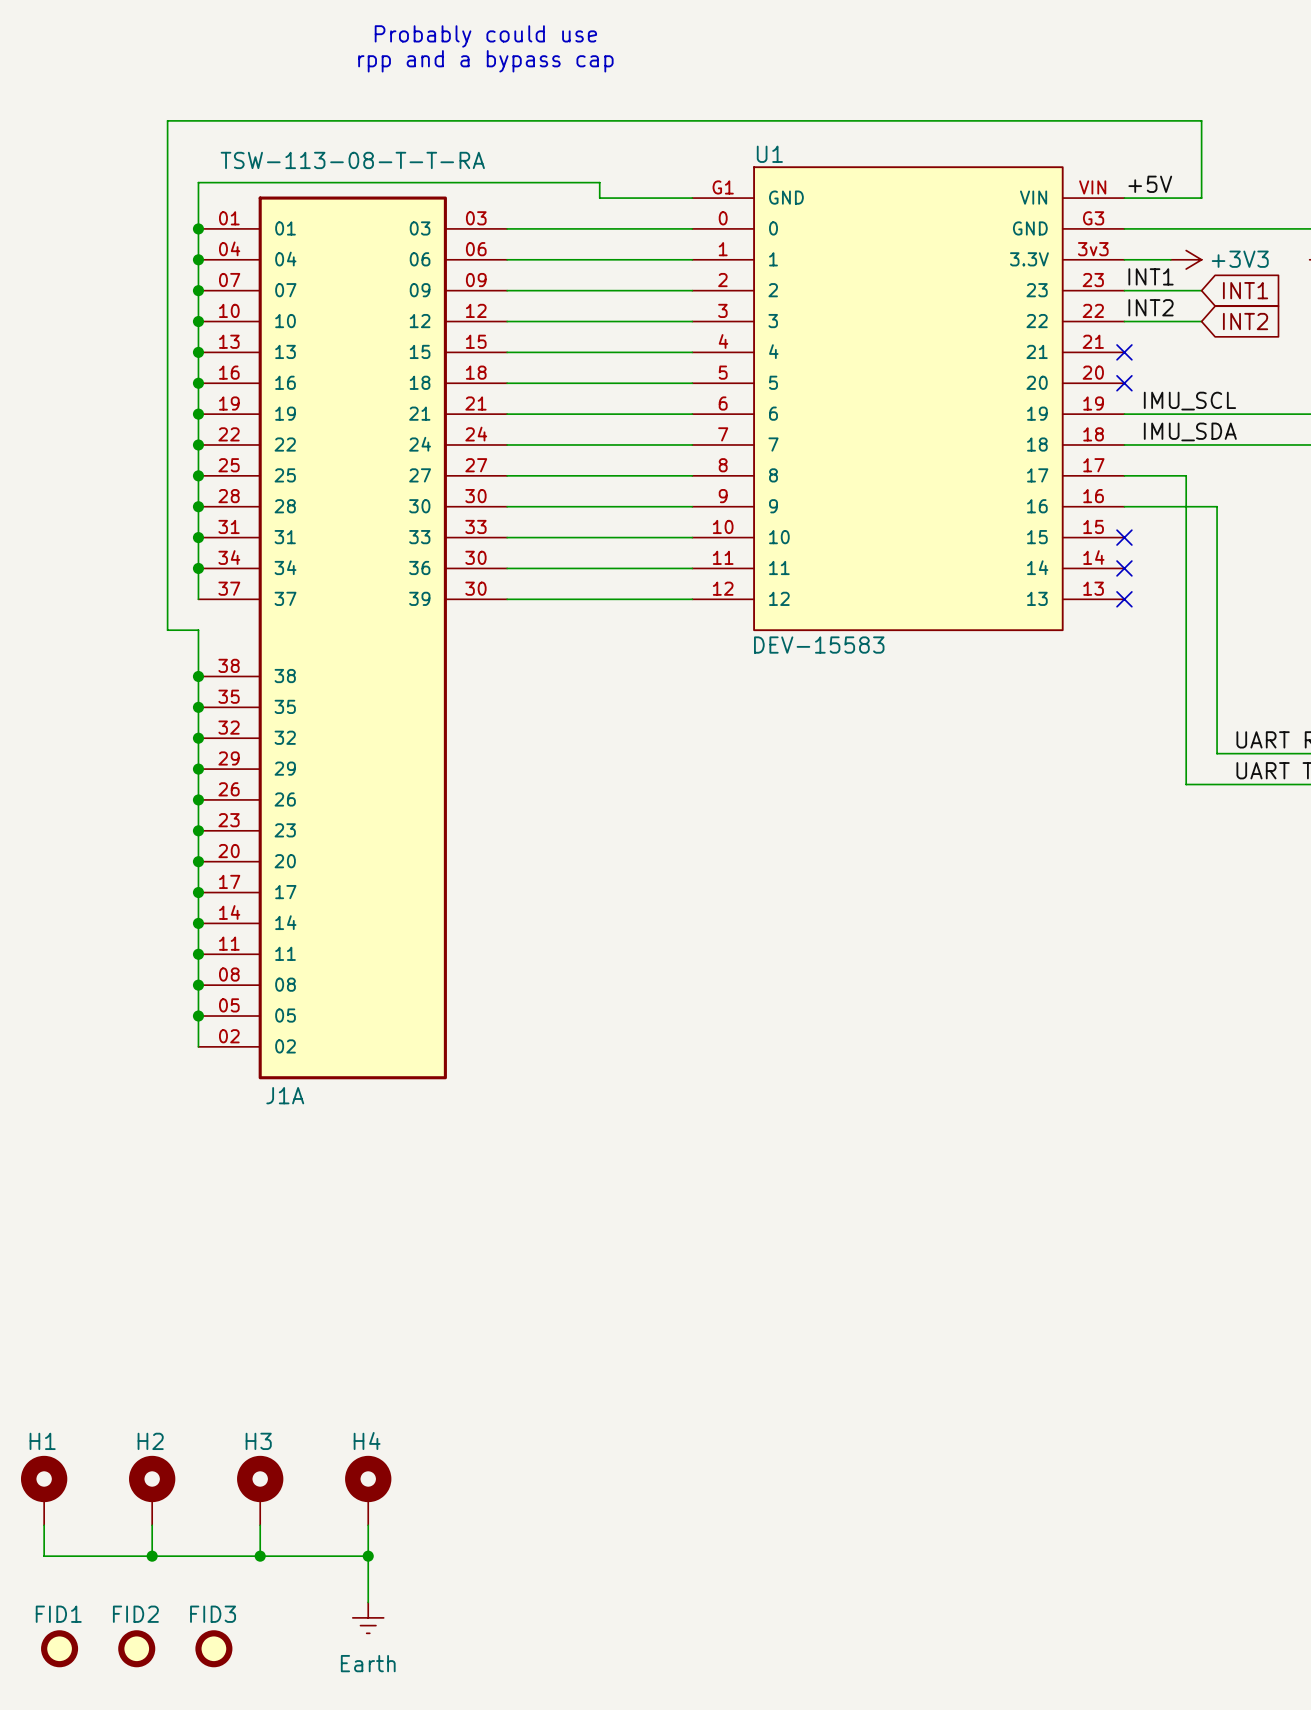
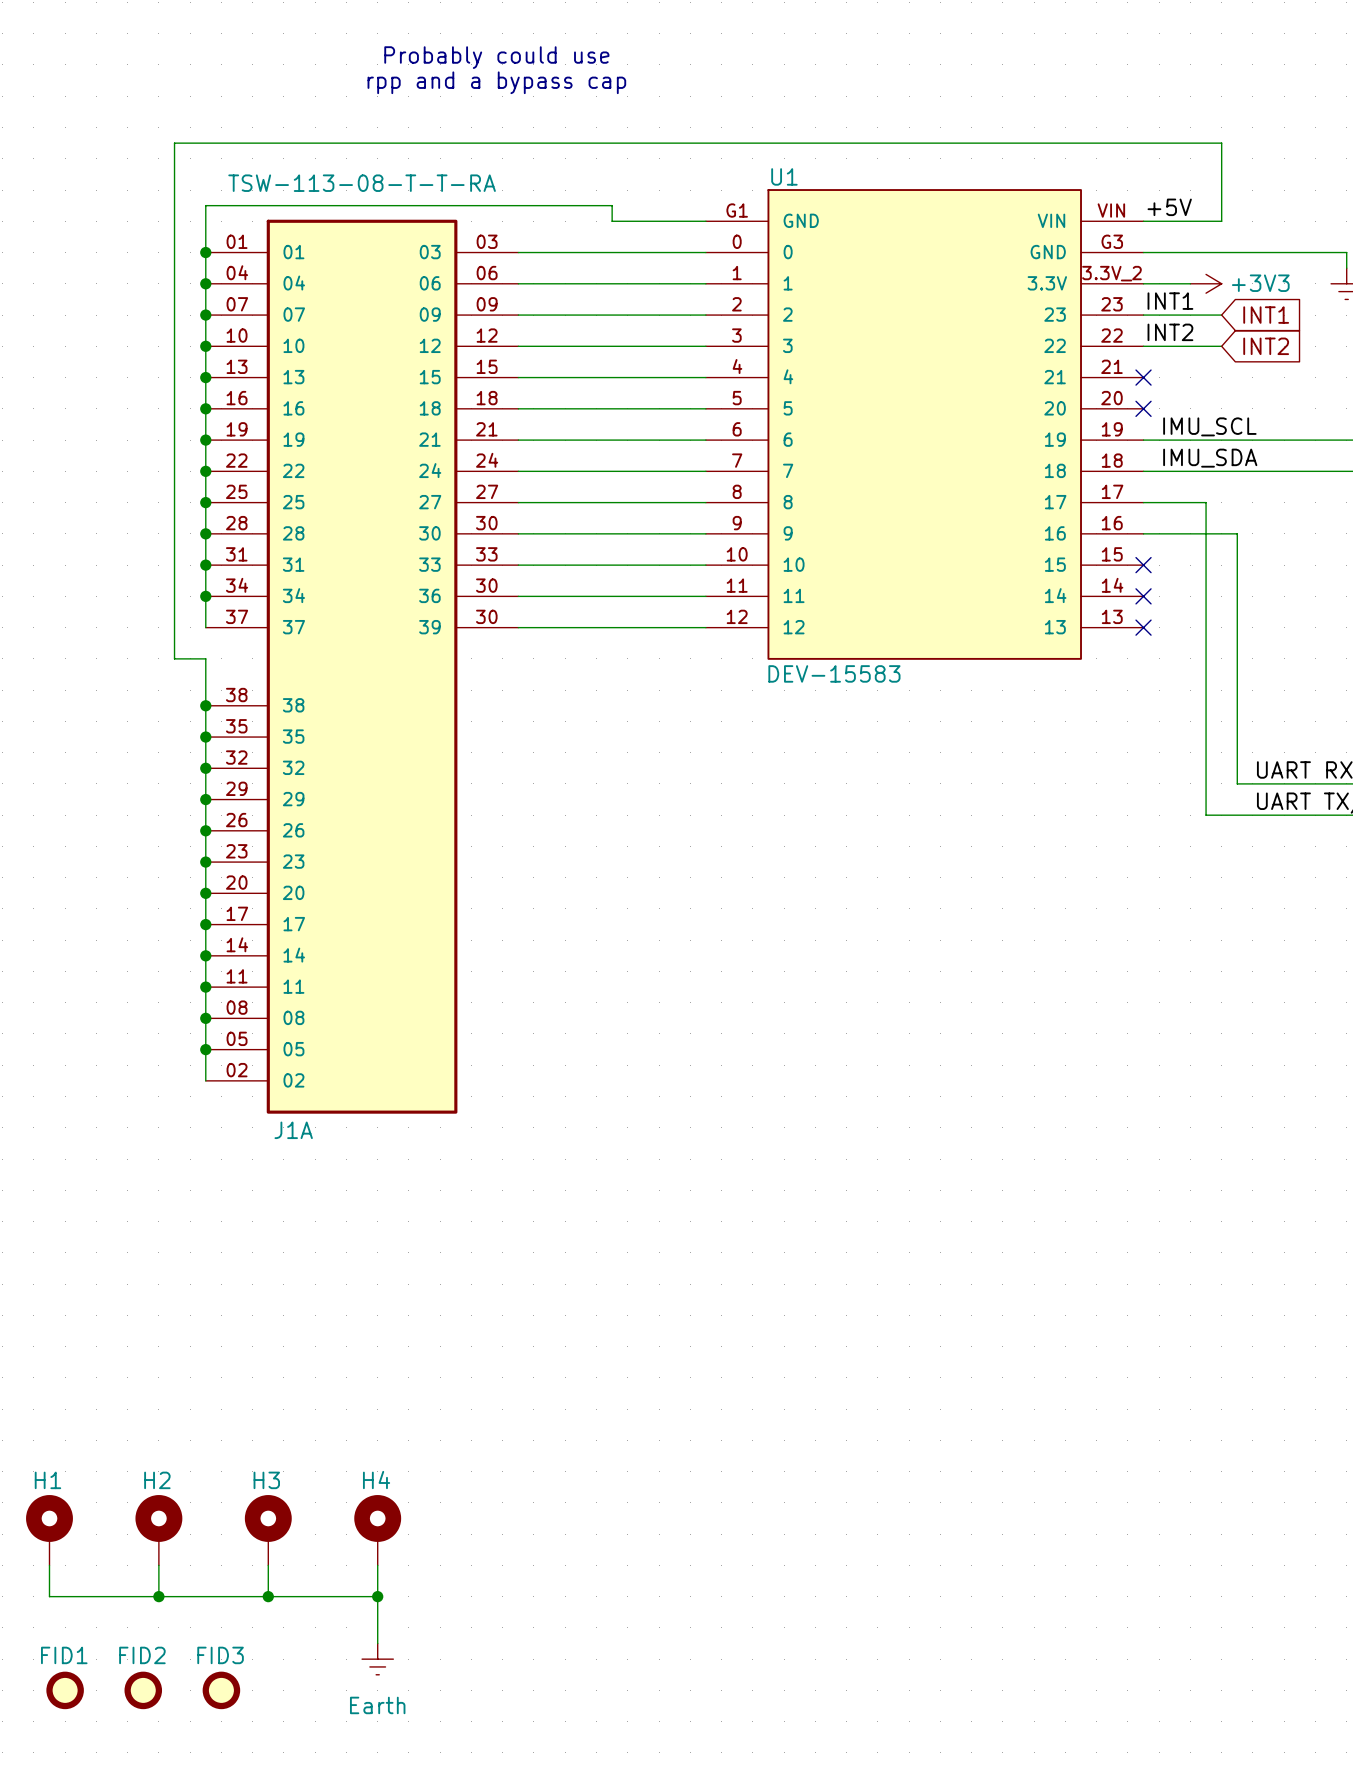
U1 pin number: 3v3 (1093, 249) -> 3.3V_2 (1111, 273)

